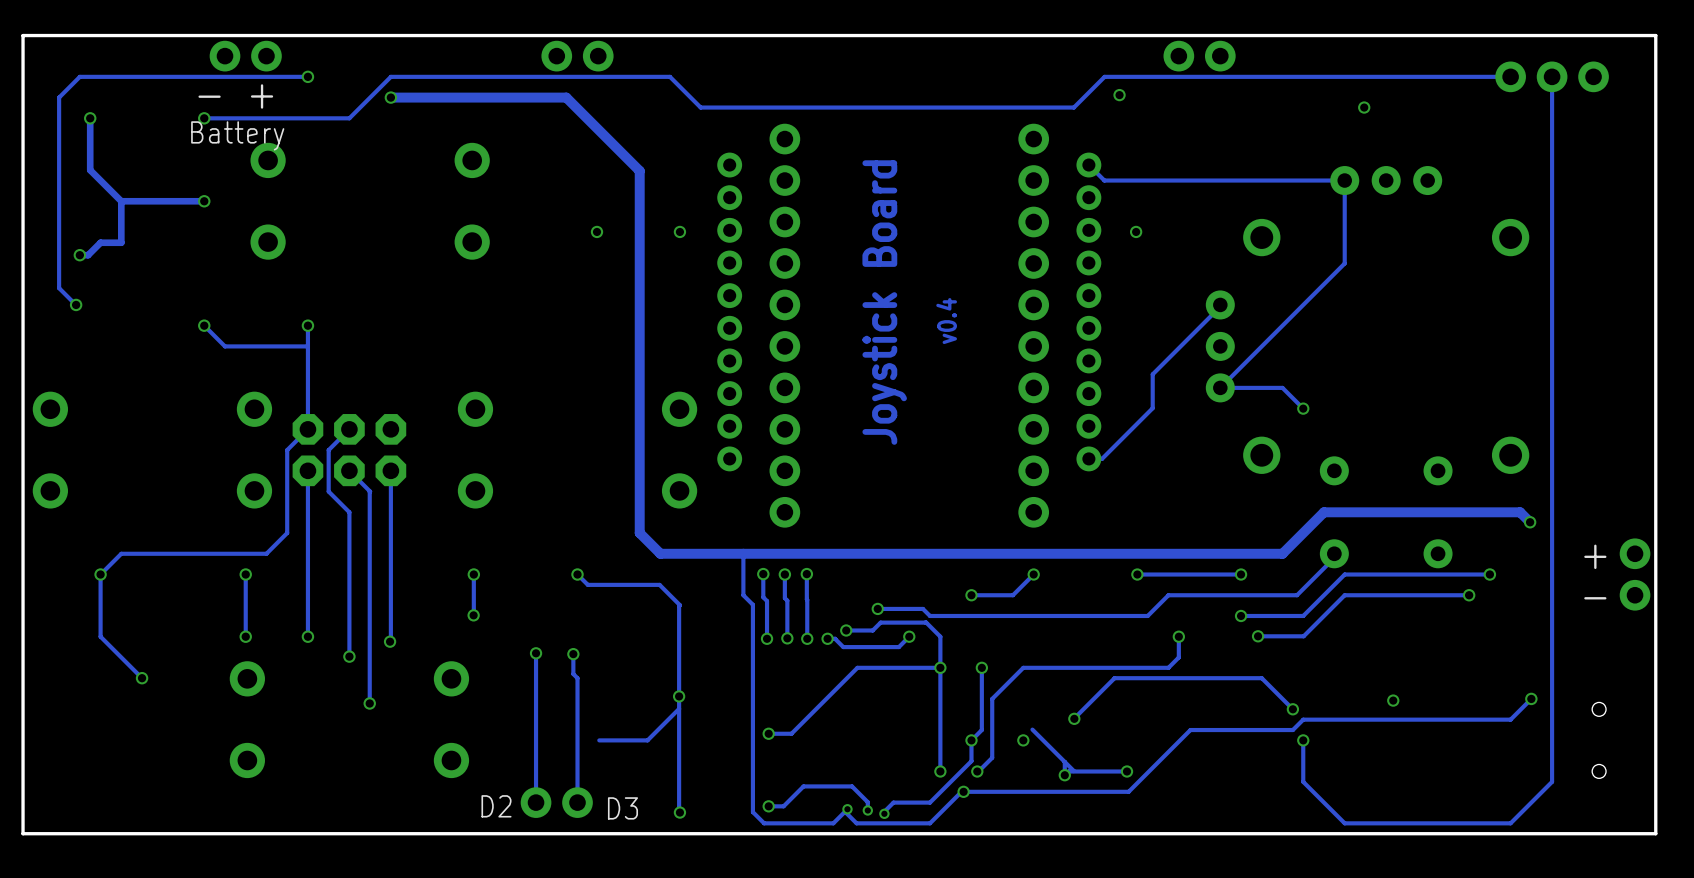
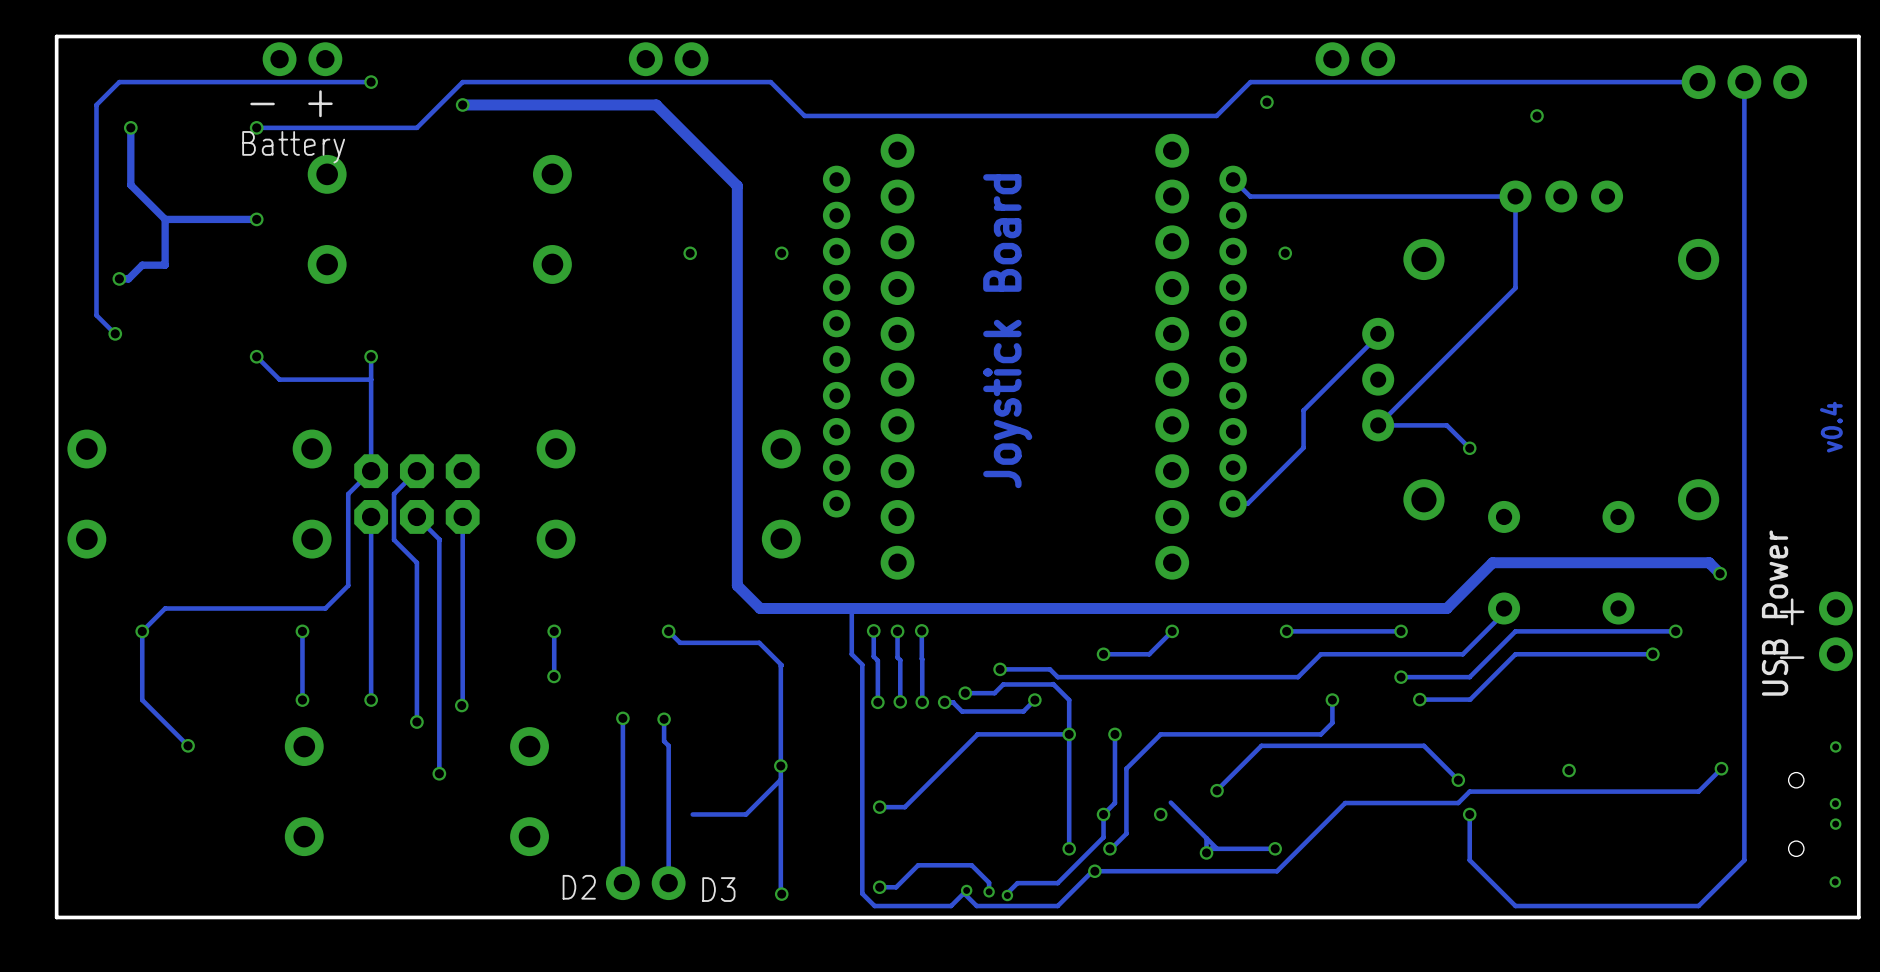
text: v0.4 (946, 321) -> none
text: none -> v0.4 (1831, 427)
text: none -> USB Power (1775, 613)
via: none -> (1835, 746)
via: none -> (1835, 803)
via: none -> (1835, 824)
via: none -> (1835, 882)

